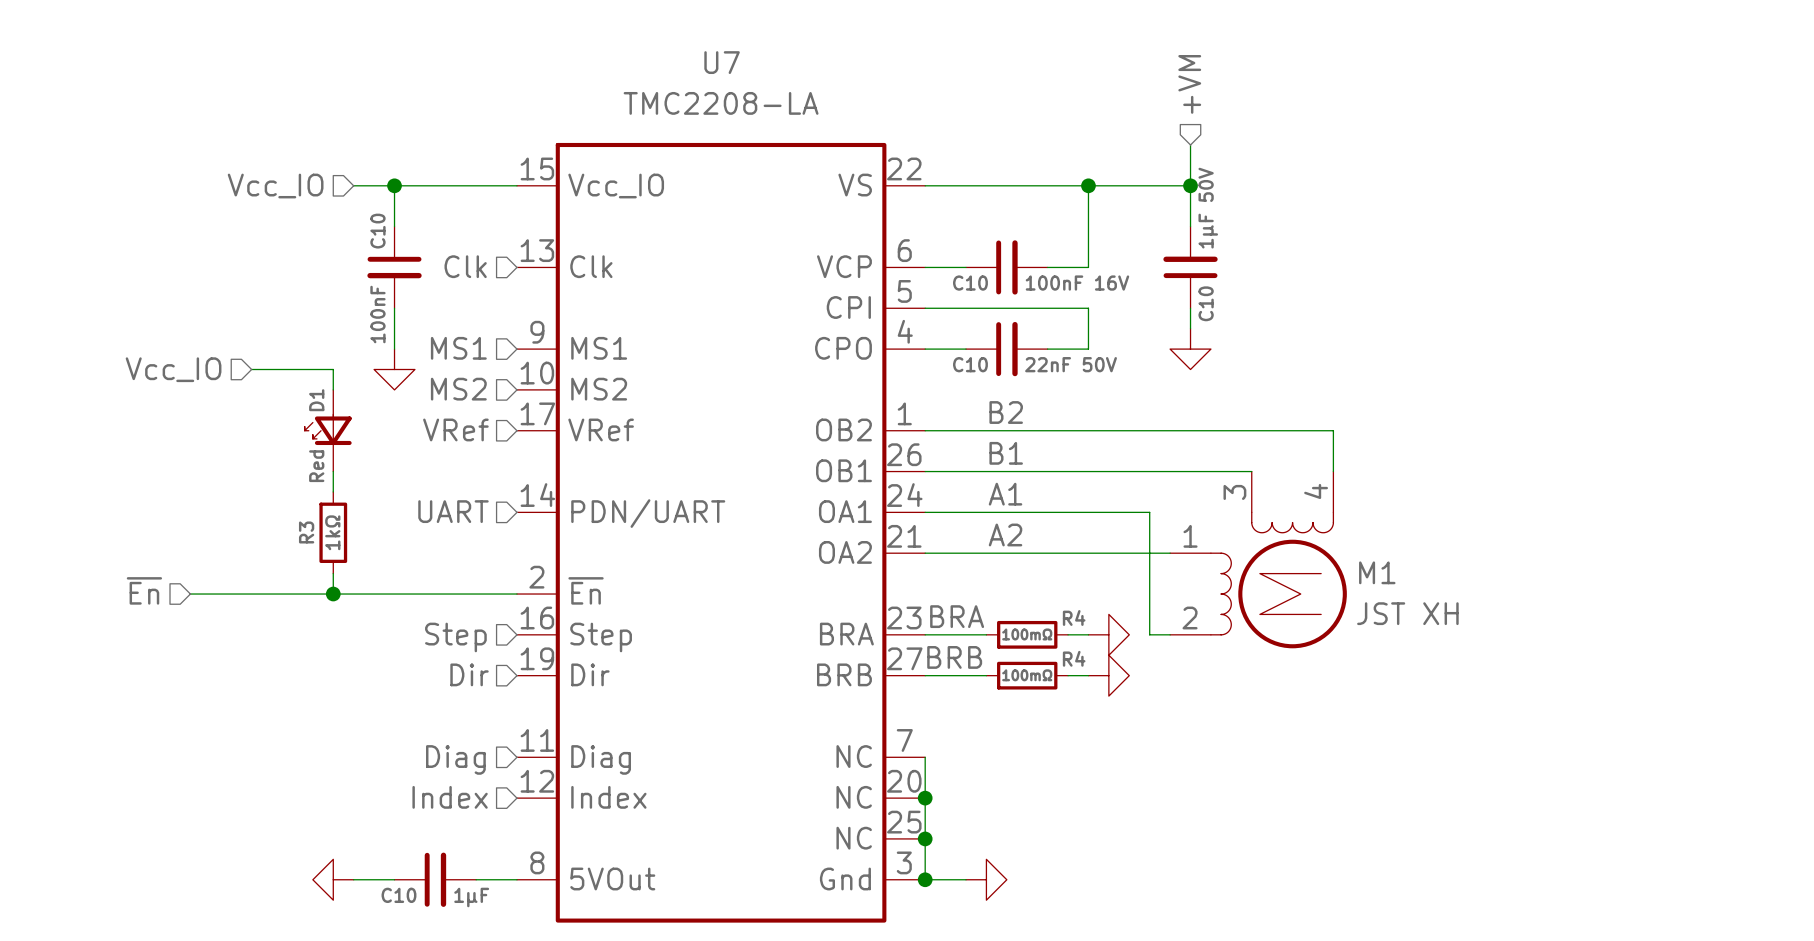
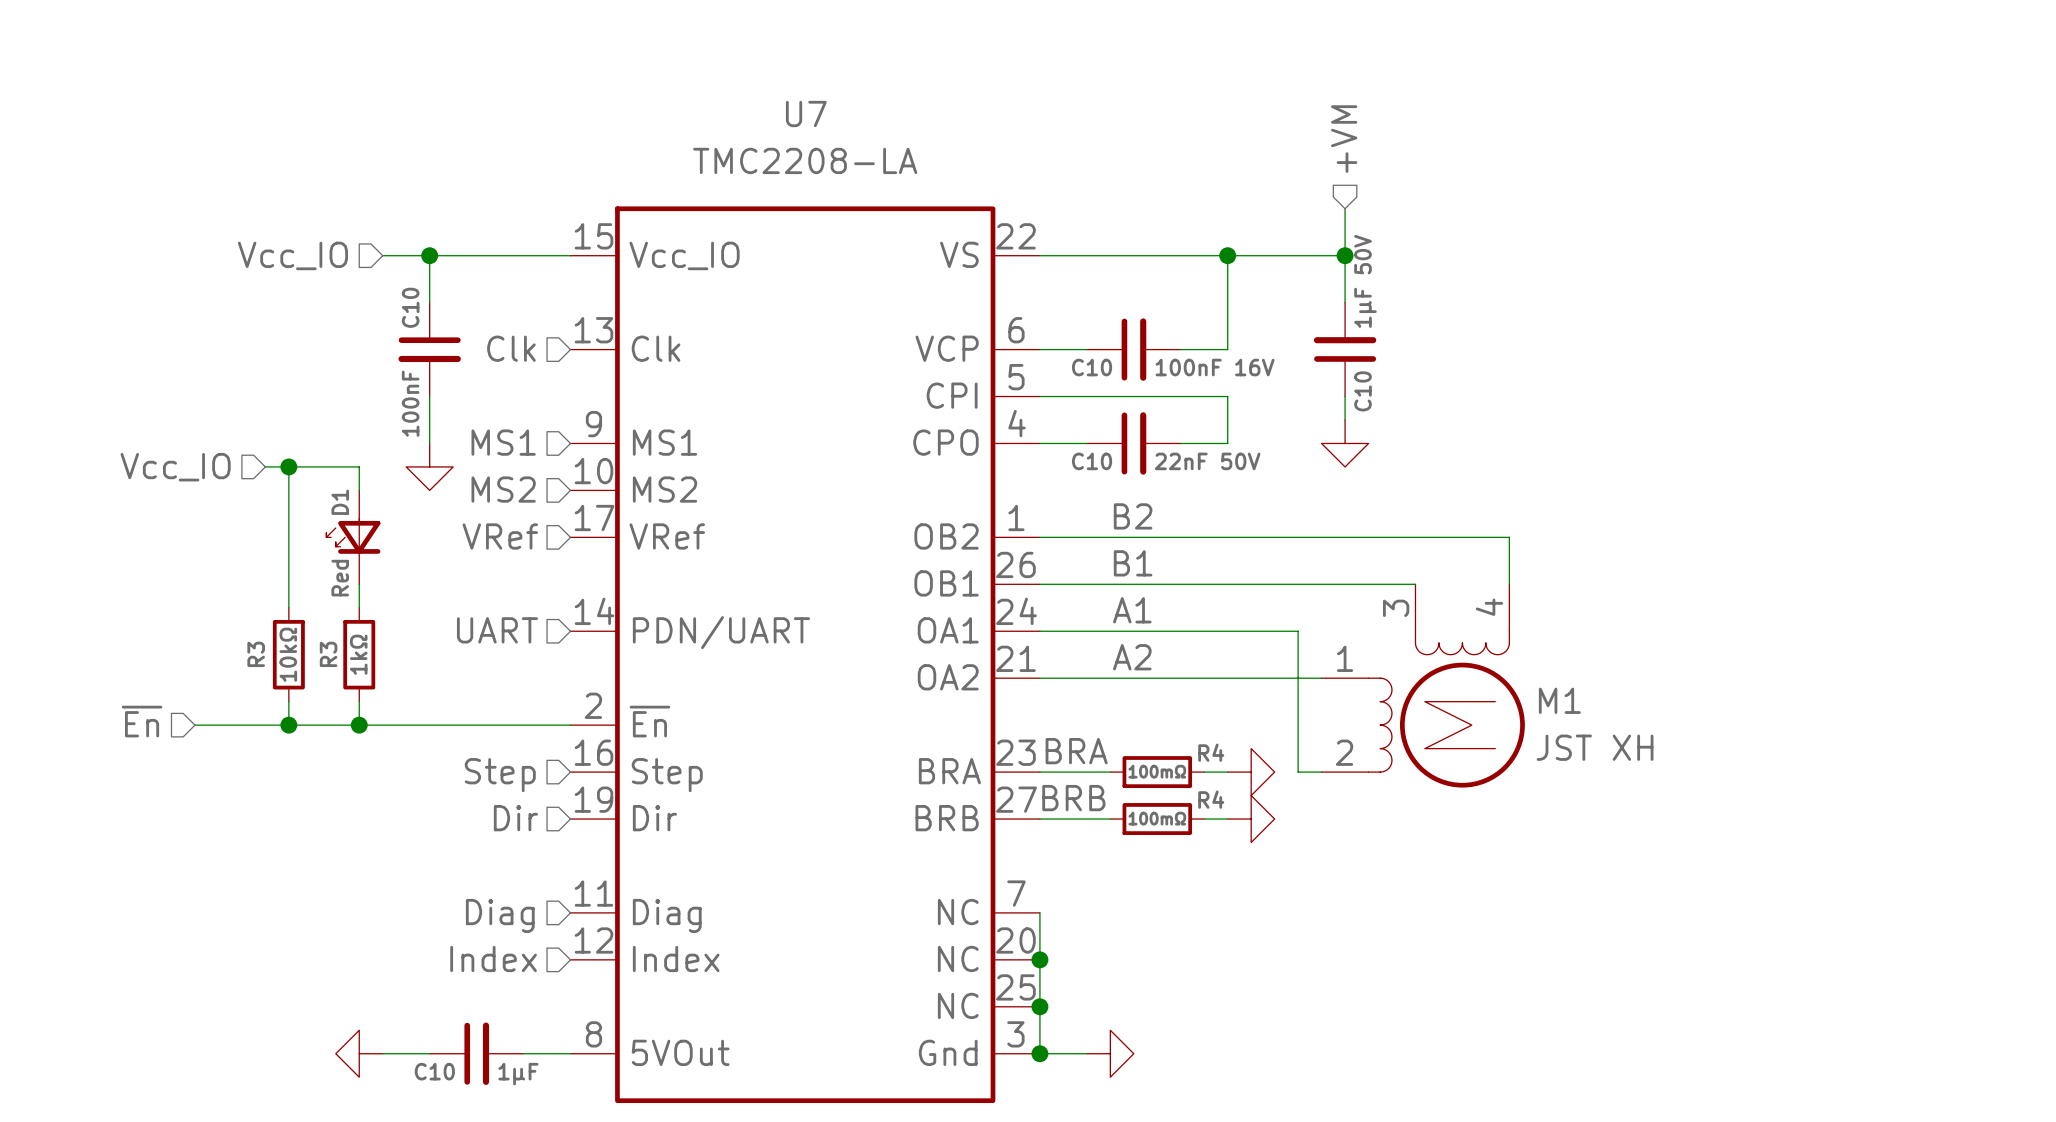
wire: none -> (288, 466) (288, 607)
junction: none -> (288, 466)
R3: none -> 10kΩ (288, 654)
wire: none -> (288, 701) (288, 725)
junction: none -> (288, 725)

